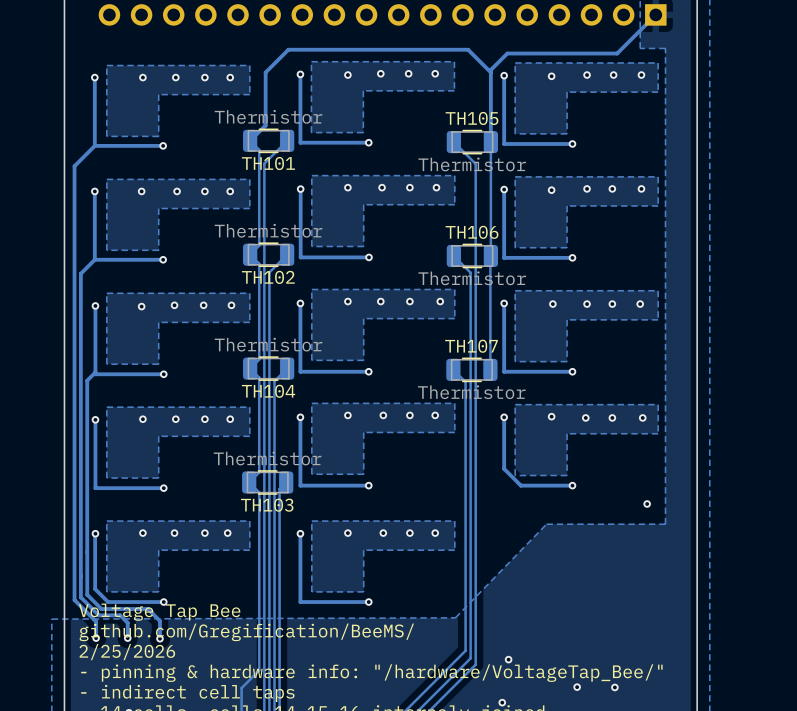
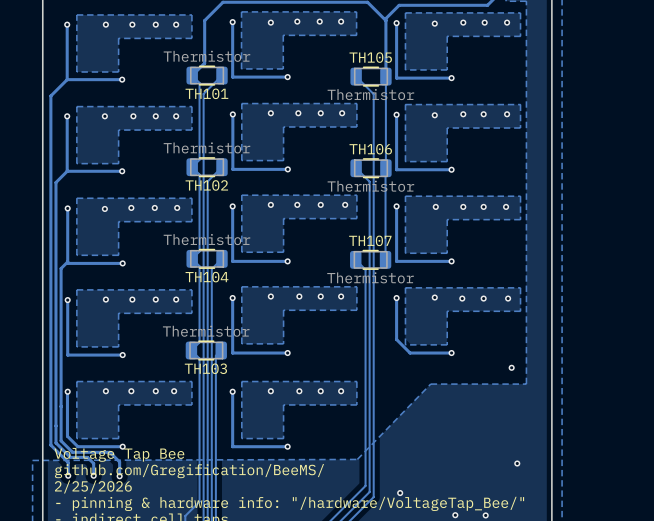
via: none -> (517, 463)

